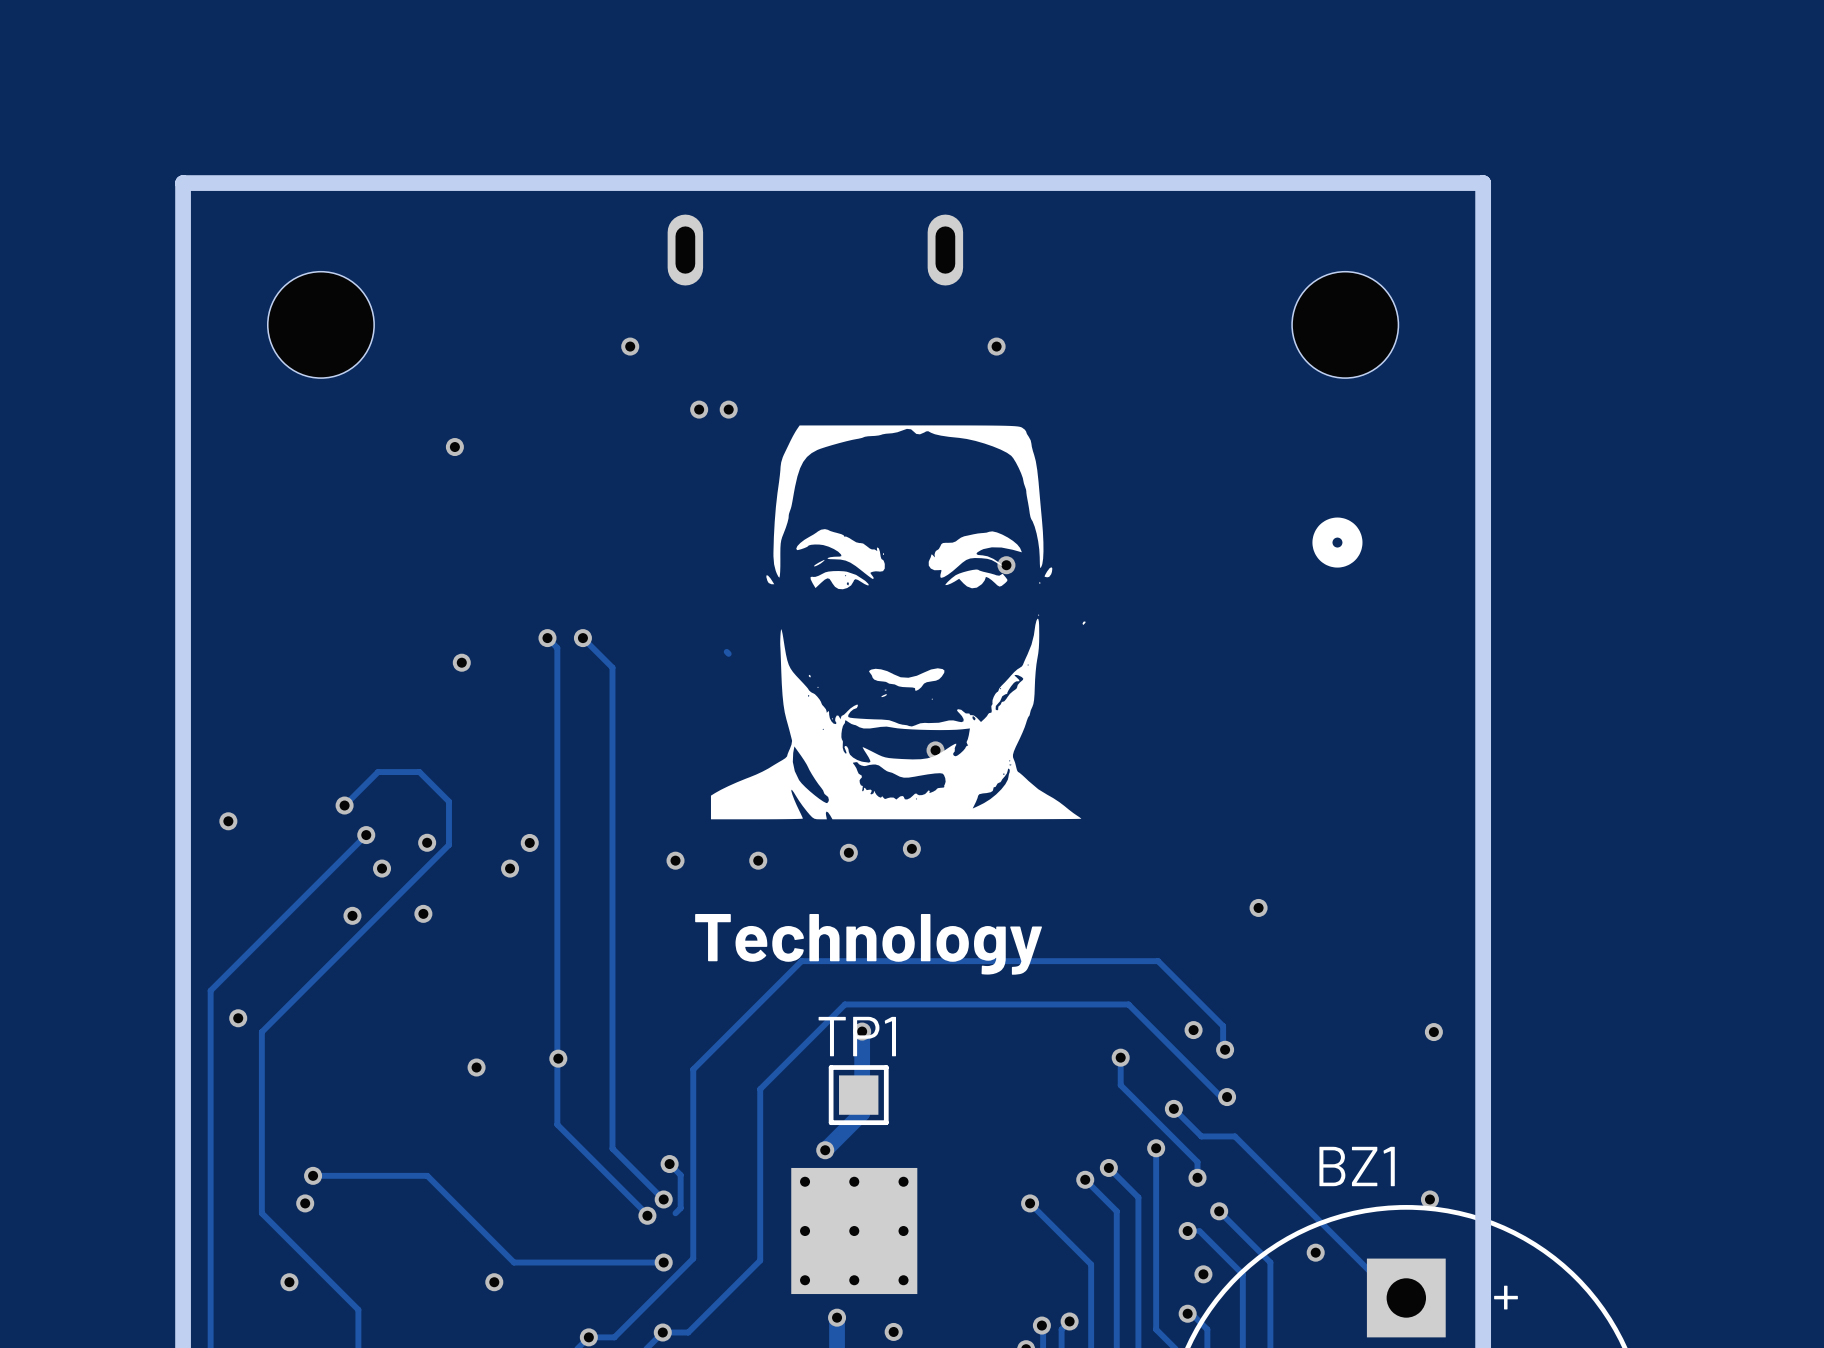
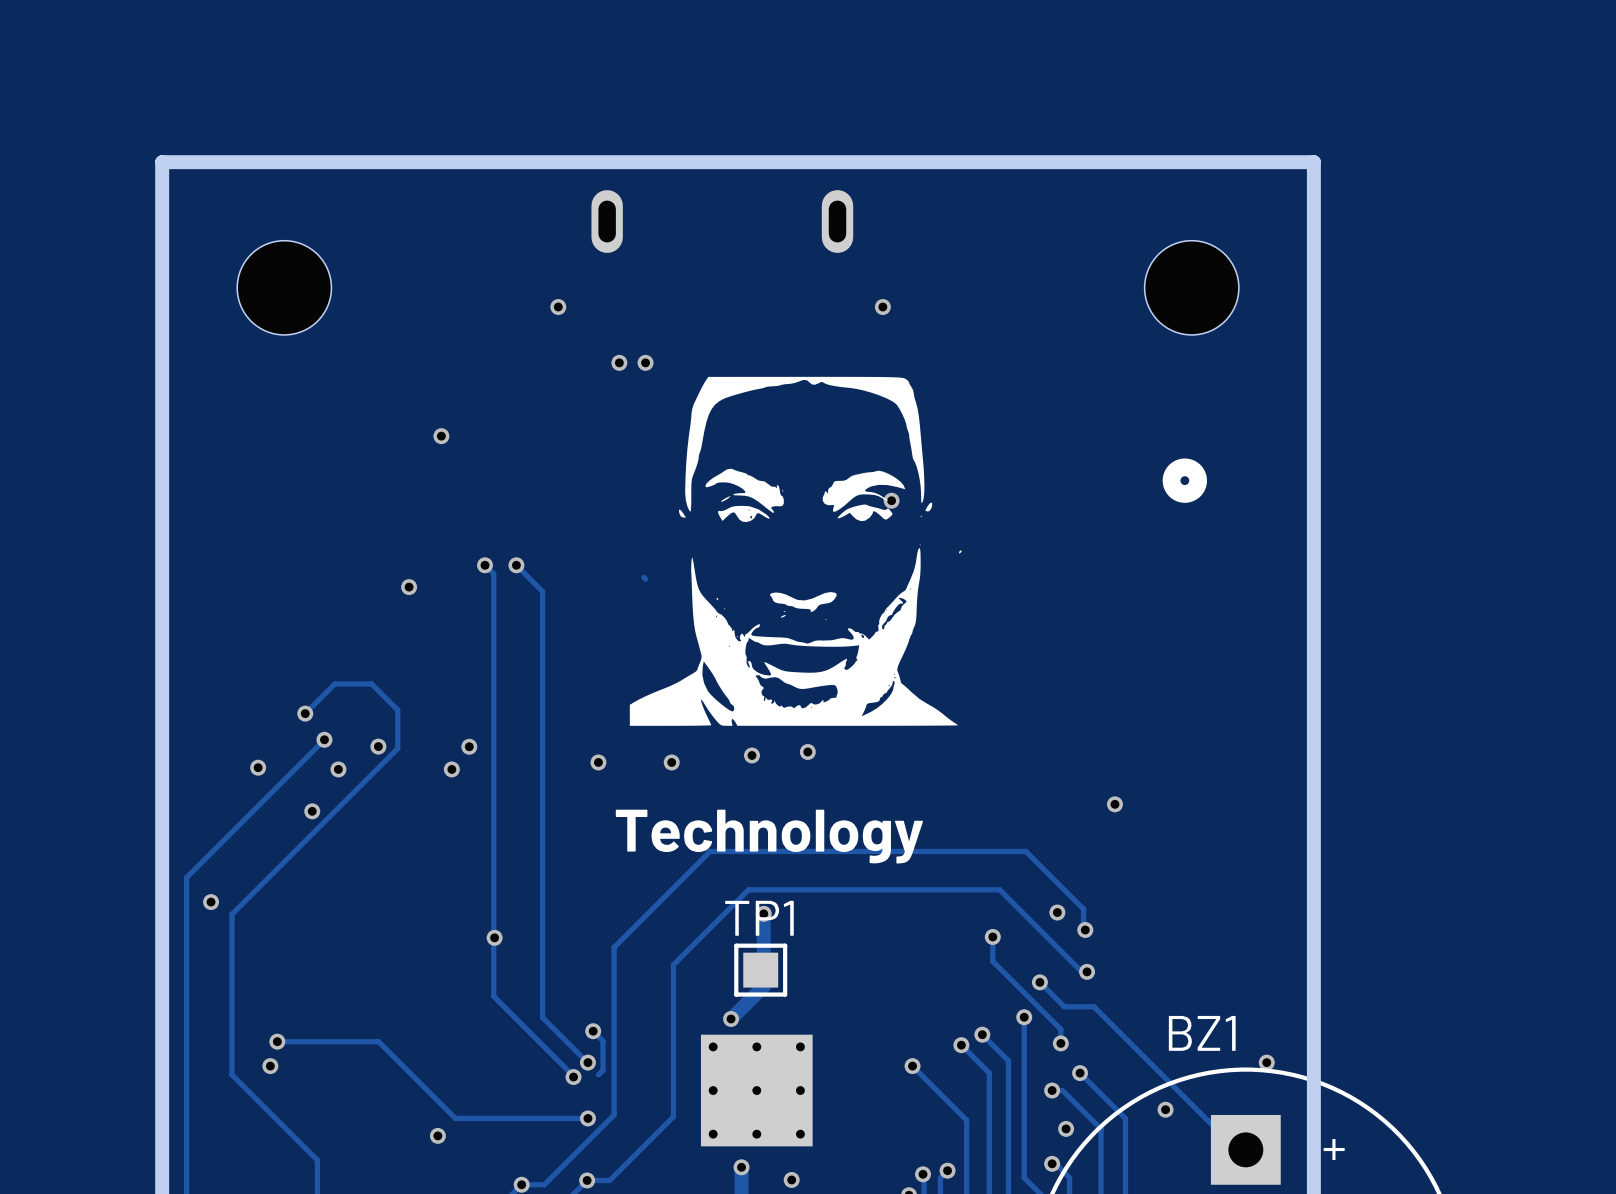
via position: (454, 447) -> (441, 436)
via: (935, 750) -> none
via: (228, 821) -> none
via: none -> (258, 767)
via: (423, 913) -> none
via: (1433, 1032) -> none
via: (476, 1067) -> none
via: (289, 1282) -> none

